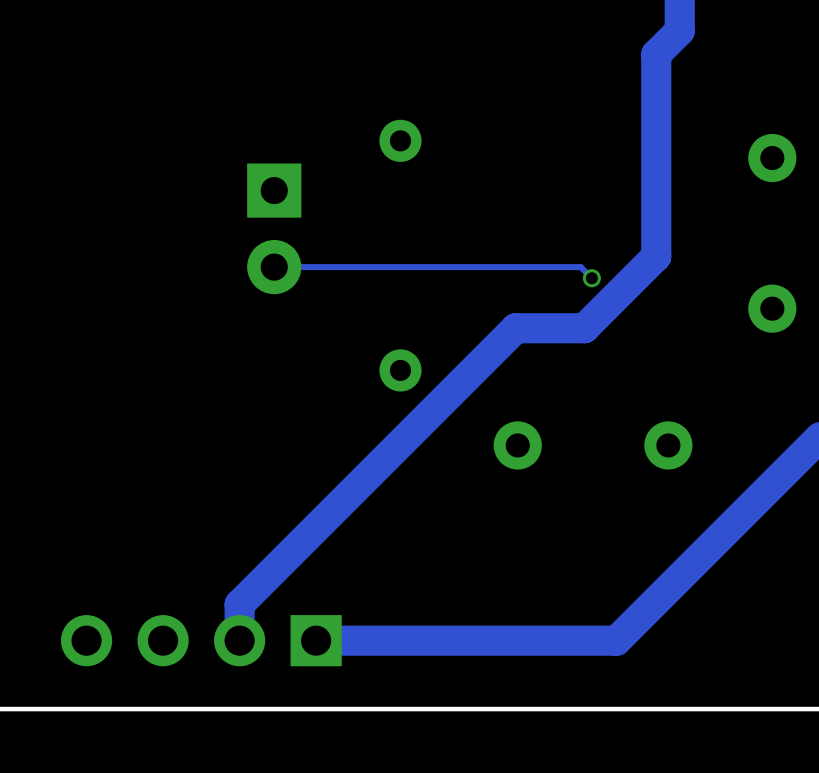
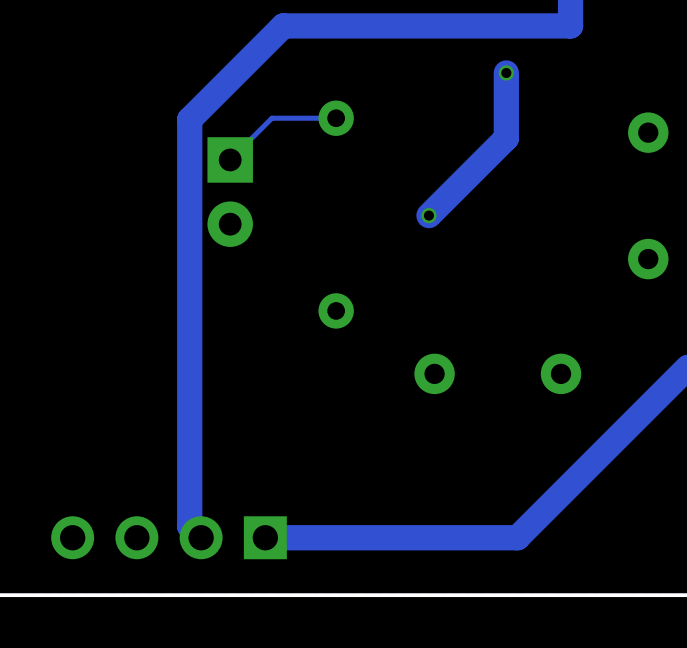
track: (679, 30) (656, 54) (656, 256) (584, 328) (515, 328) (239, 604) (239, 640) -> (570, 25) (283, 25) (189, 119) (189, 526) (201, 537)
track: none -> (506, 72) (506, 138) (428, 215)
via: none -> (506, 72)
track: none -> (336, 118) (271, 118) (230, 159)
track: (274, 267) (580, 267) (591, 278) -> none
via position: (591, 278) -> (428, 215)

